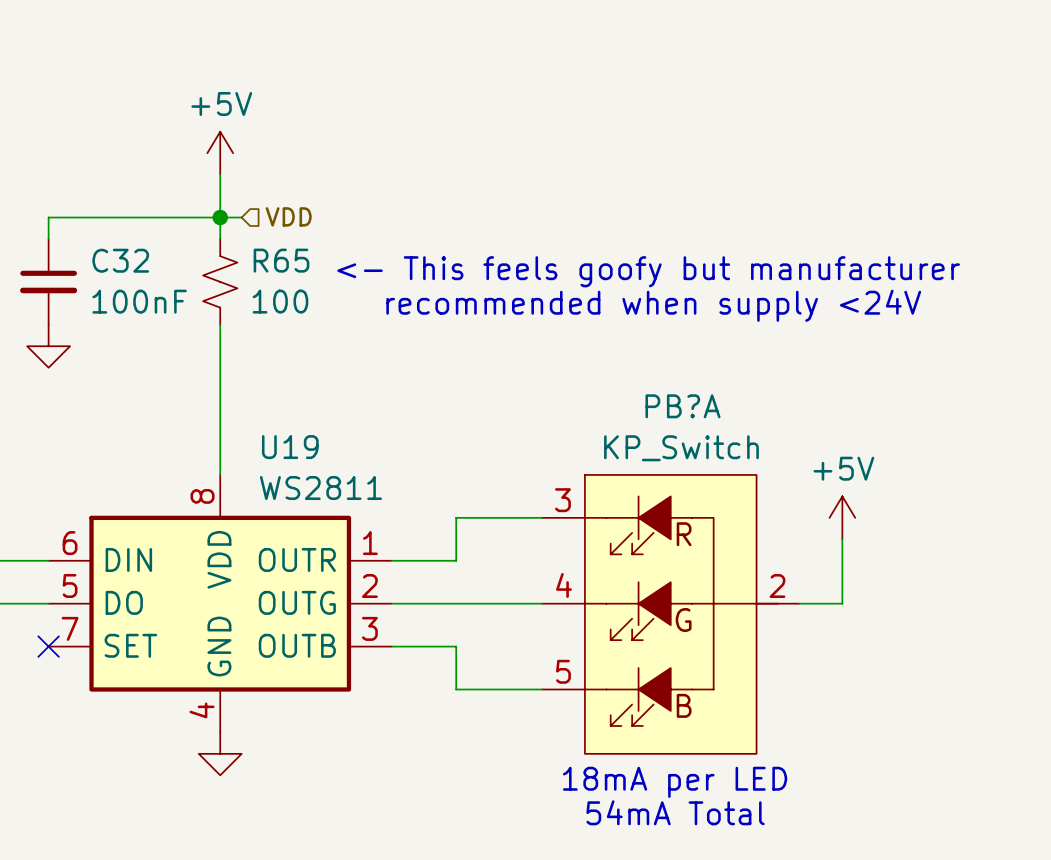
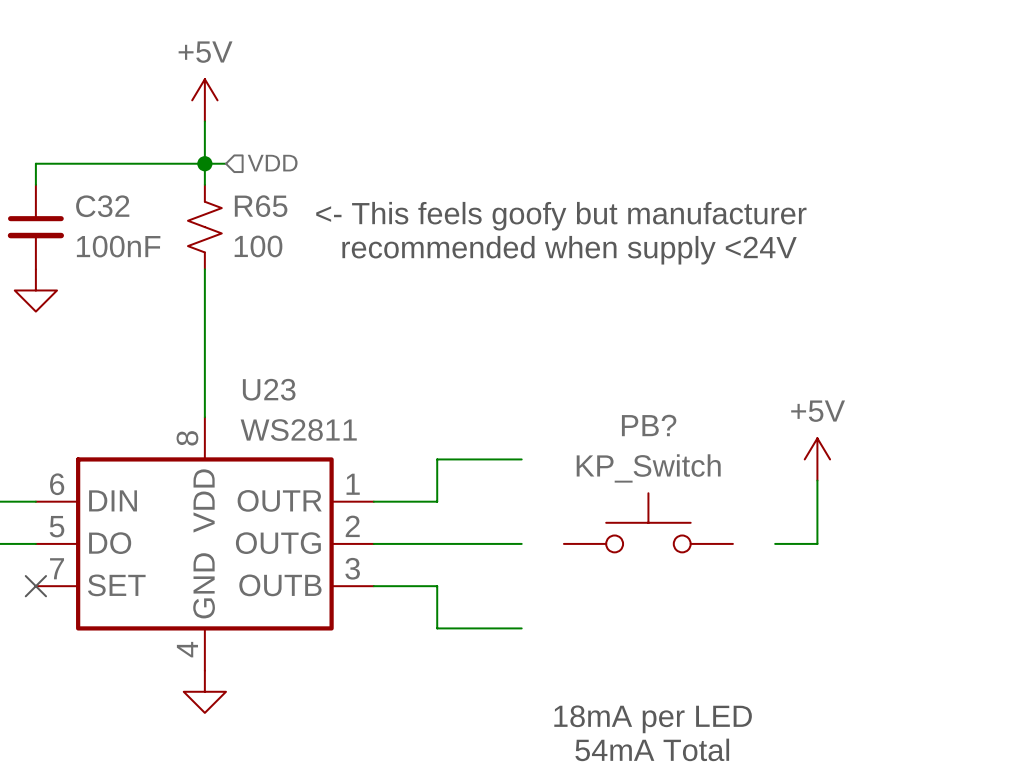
U19 name: U19 (290, 447) -> U23 (269, 389)
PB?: none -> KP_Switch (648, 522)
PB?A: KP_Switch (670, 614) -> none

